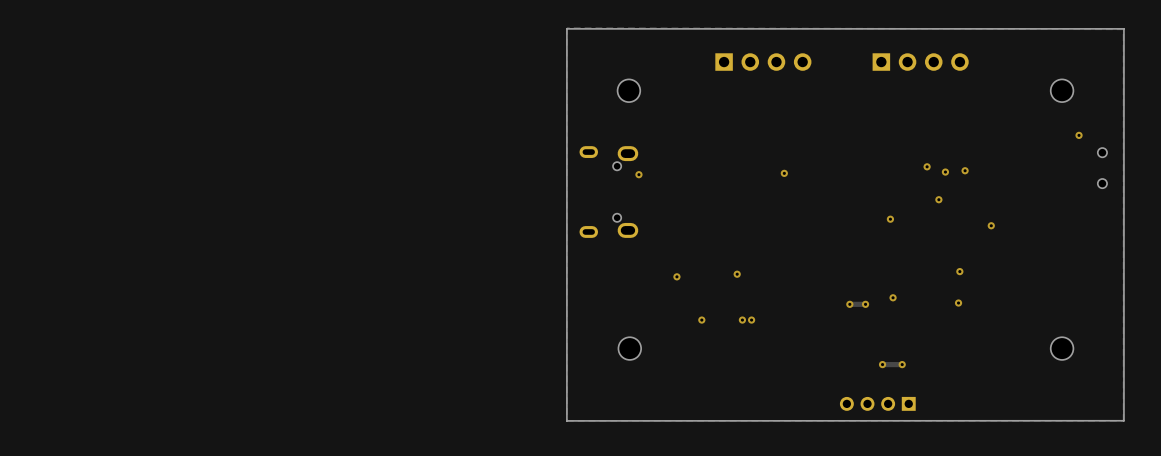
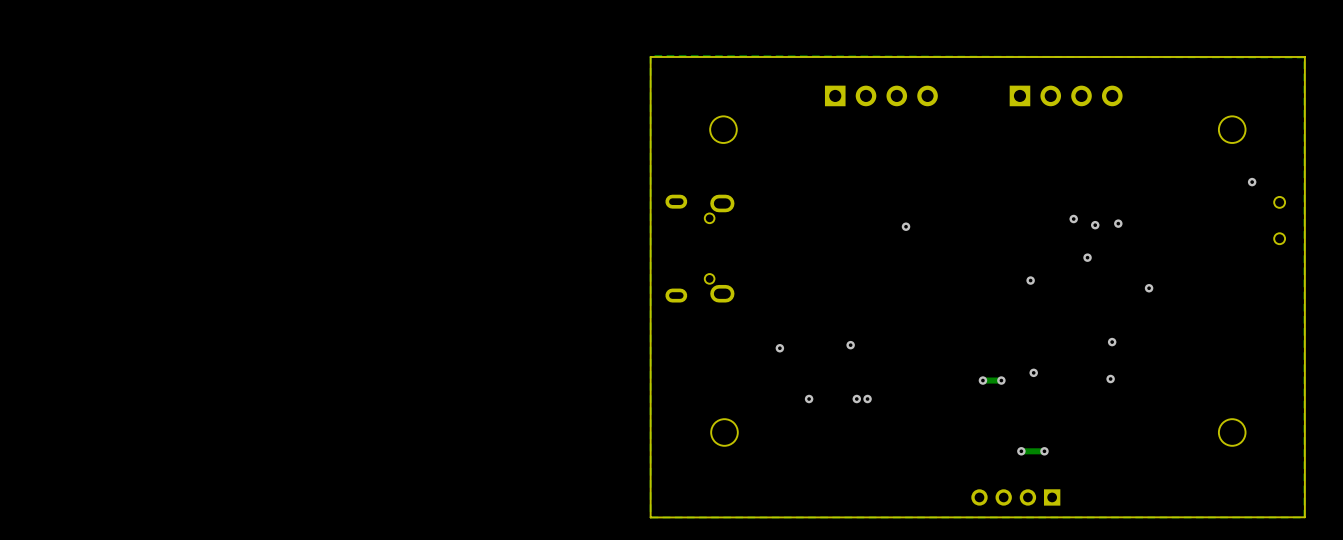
via: (638, 174) -> none

